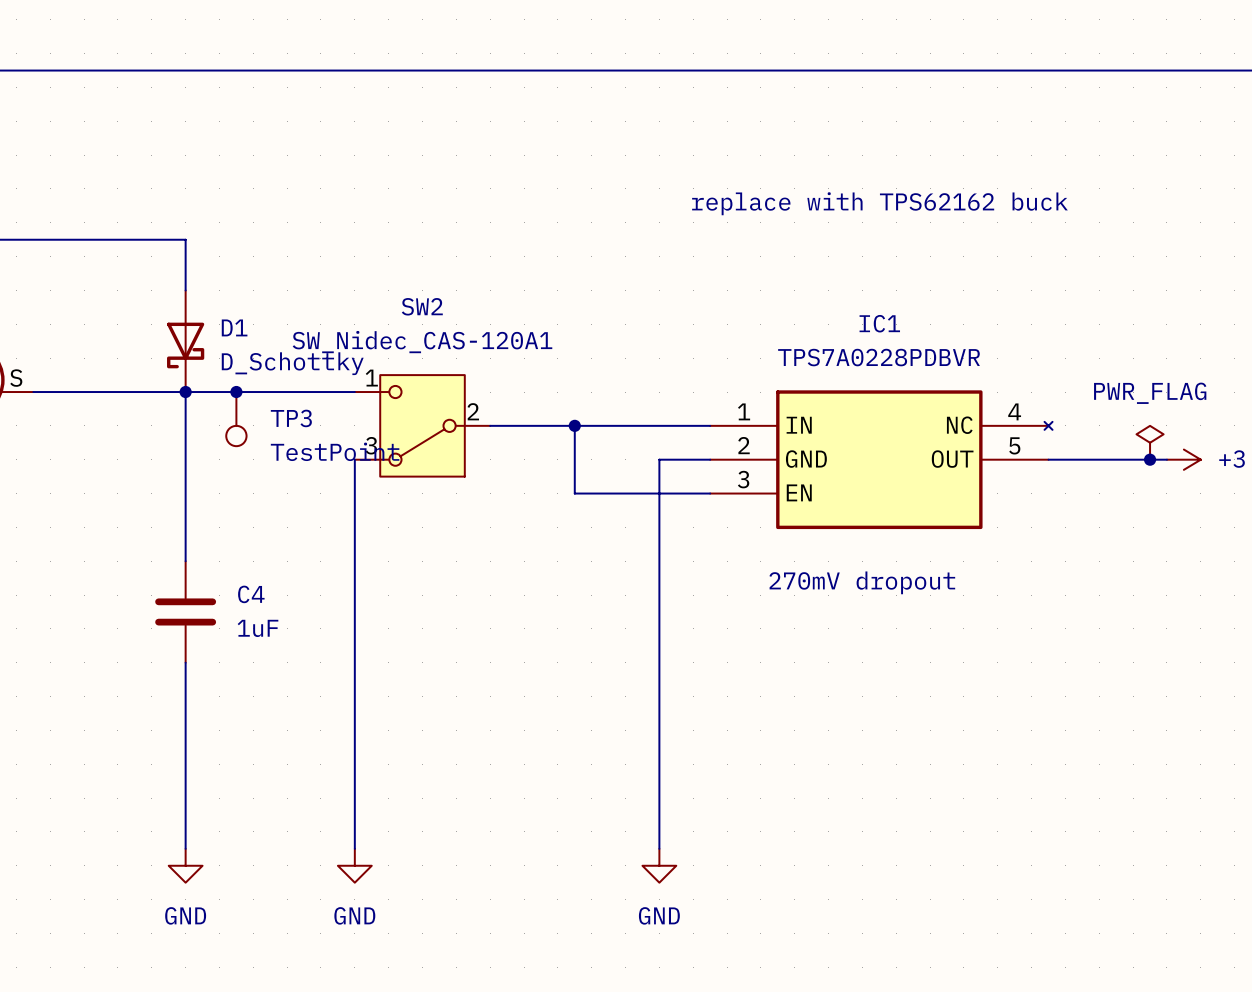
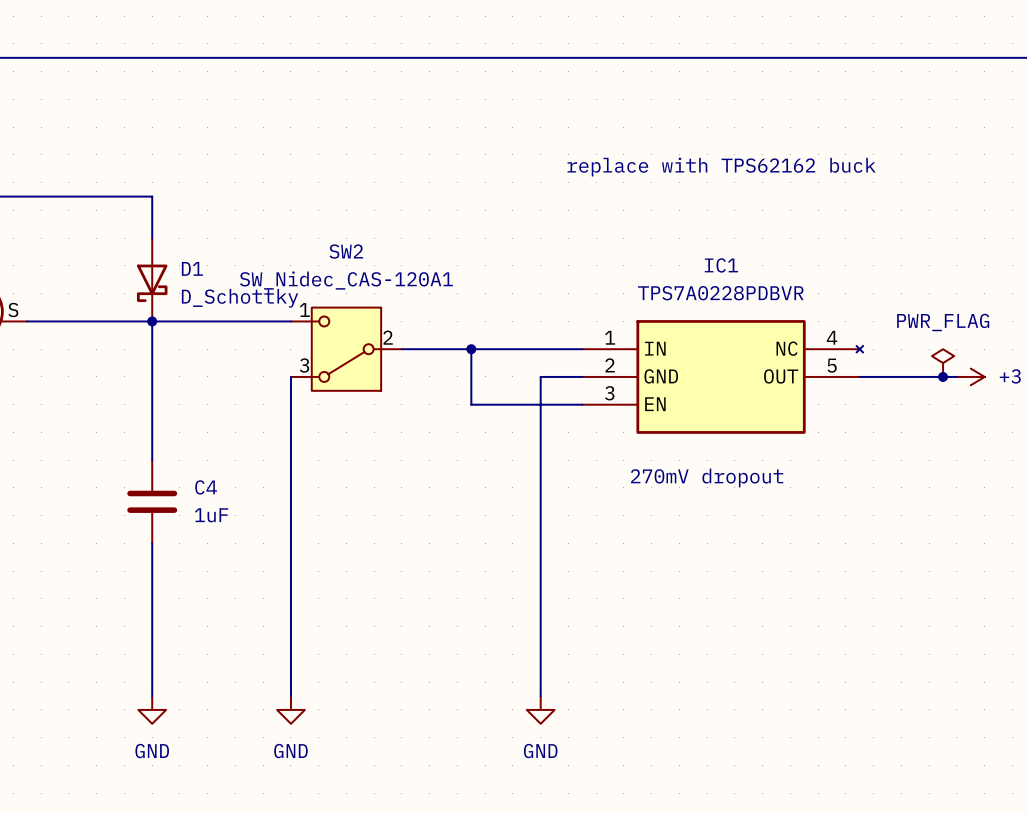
junction: (236, 392) -> none
TP3: TestPoint (236, 419) -> none

